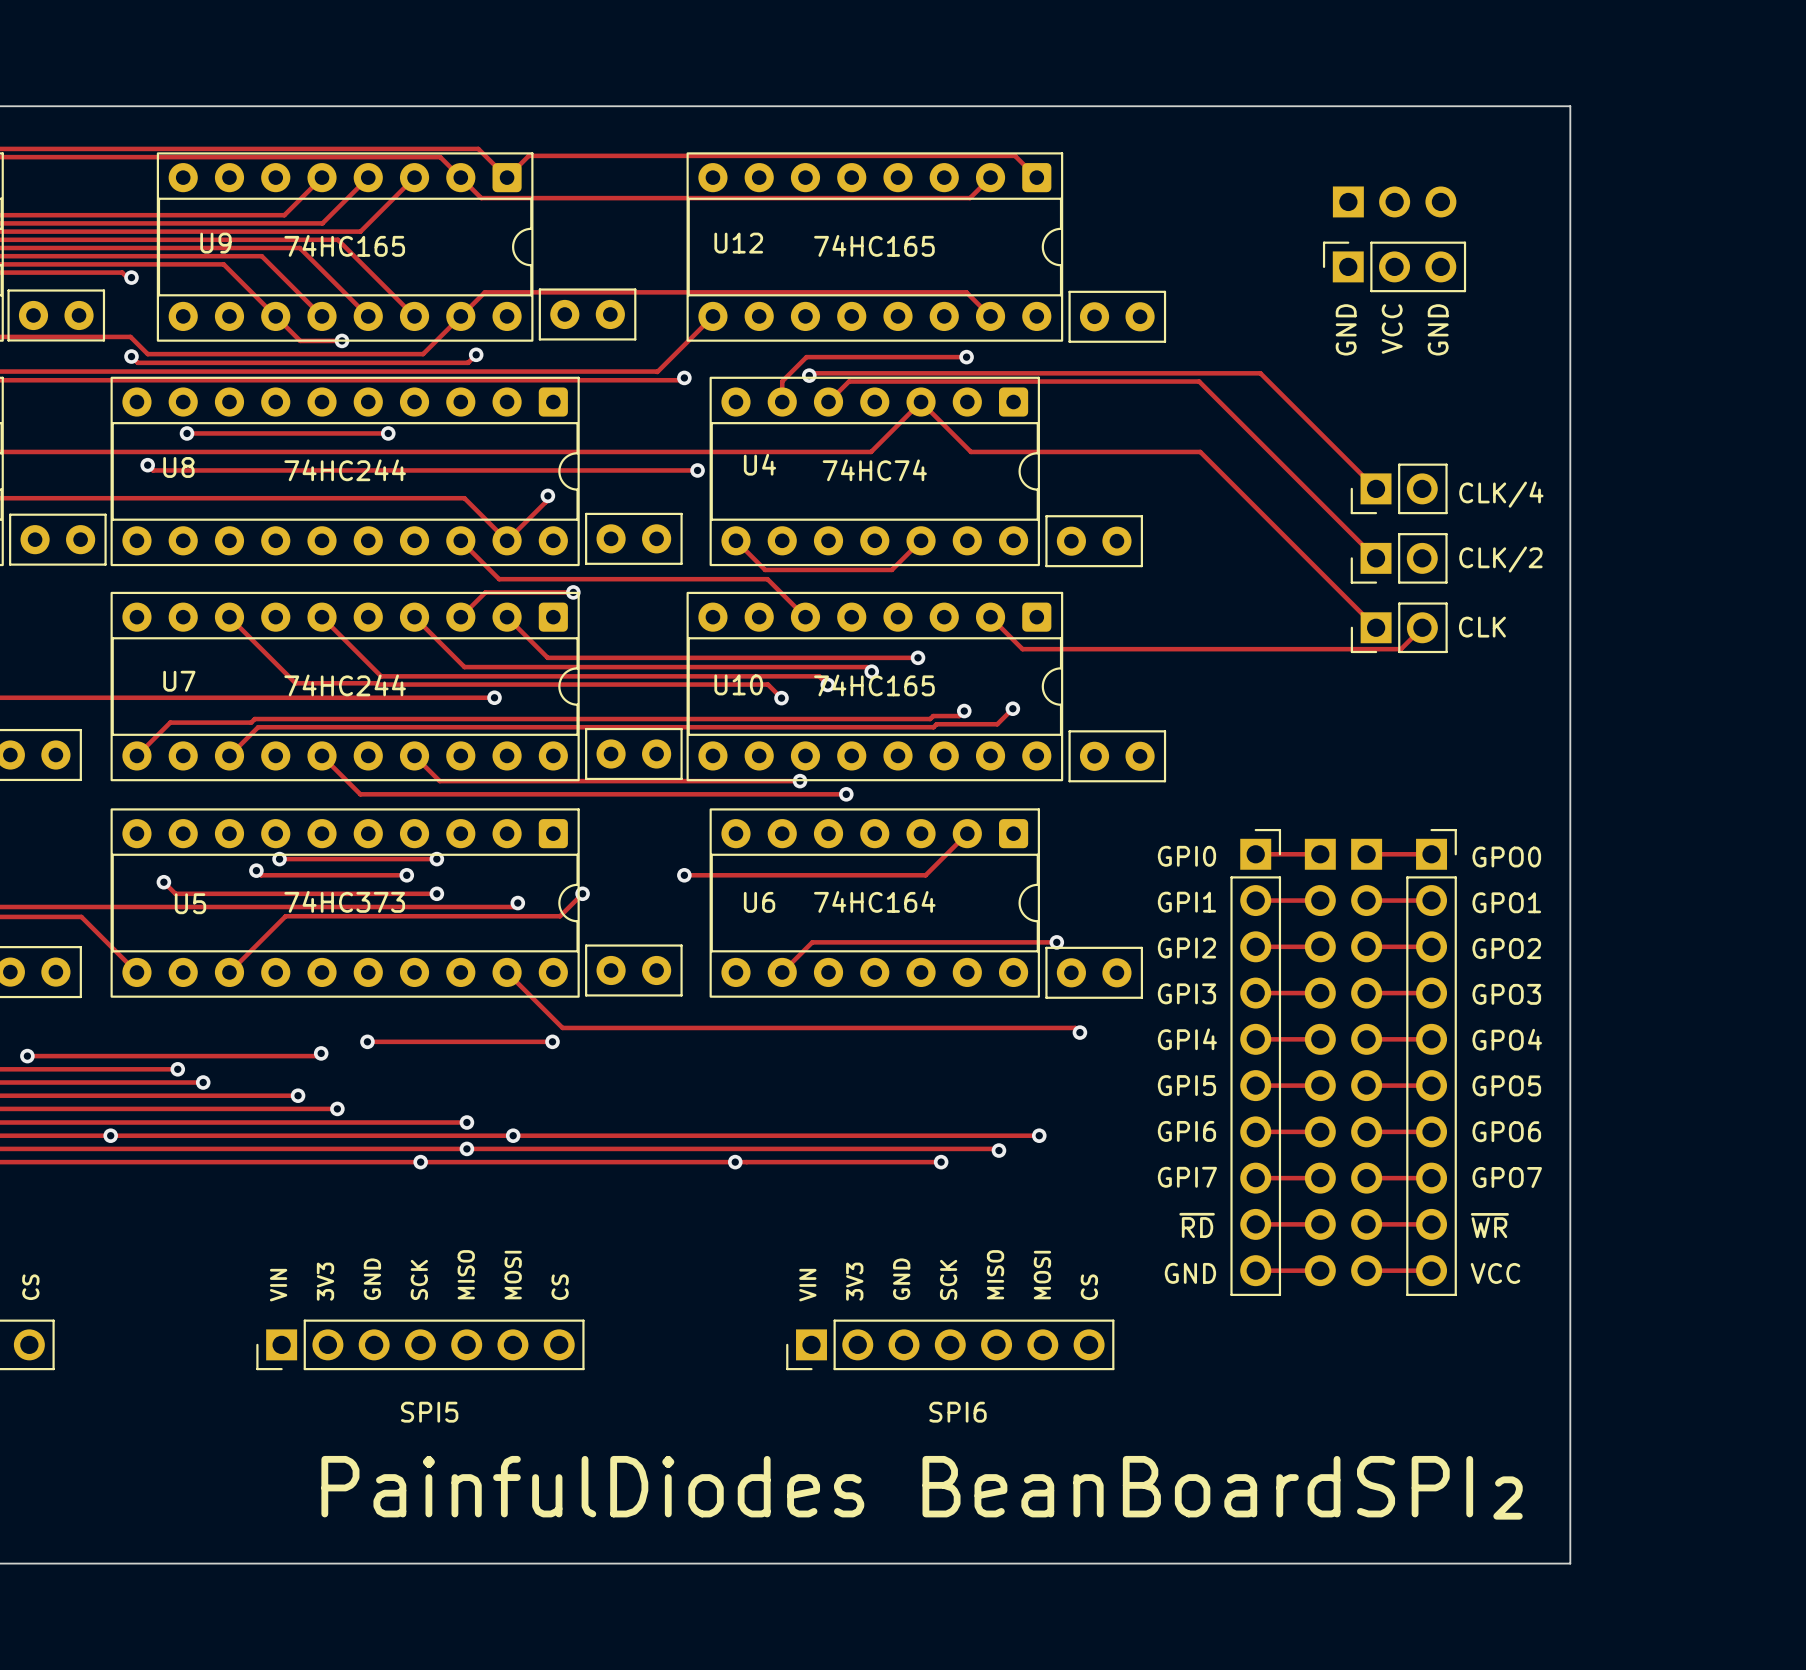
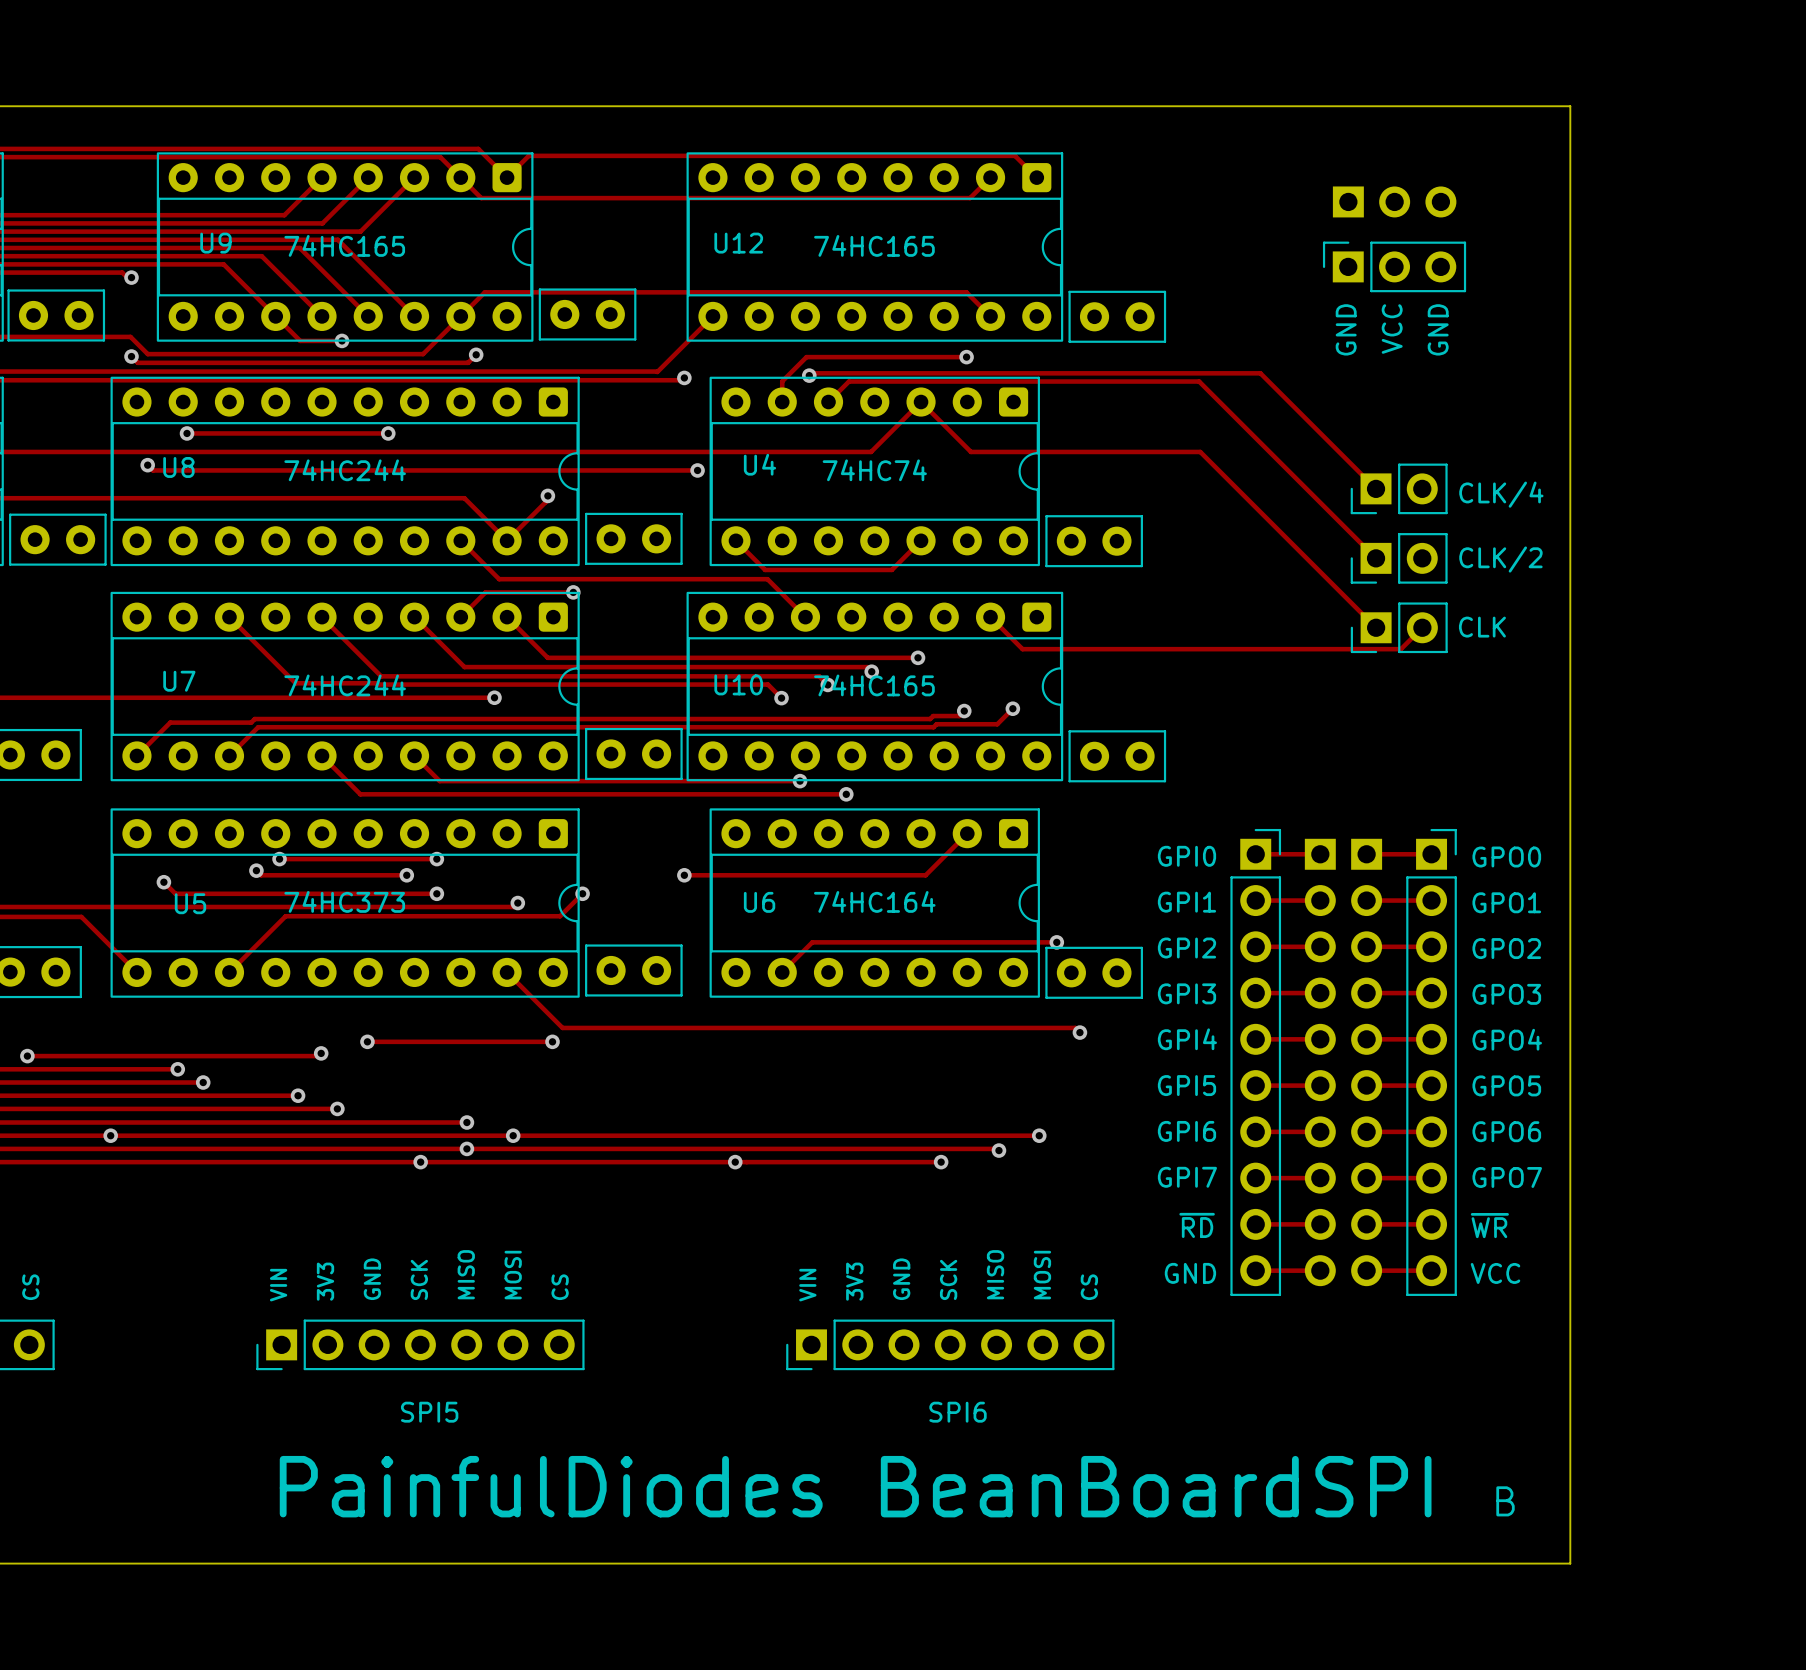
text position: PainfulDiodes BeanBoardSPI (897, 1486) -> PainfulDiodes BeanBoardSPI (855, 1486)
text: 2 (1508, 1498) -> B (1505, 1501)

